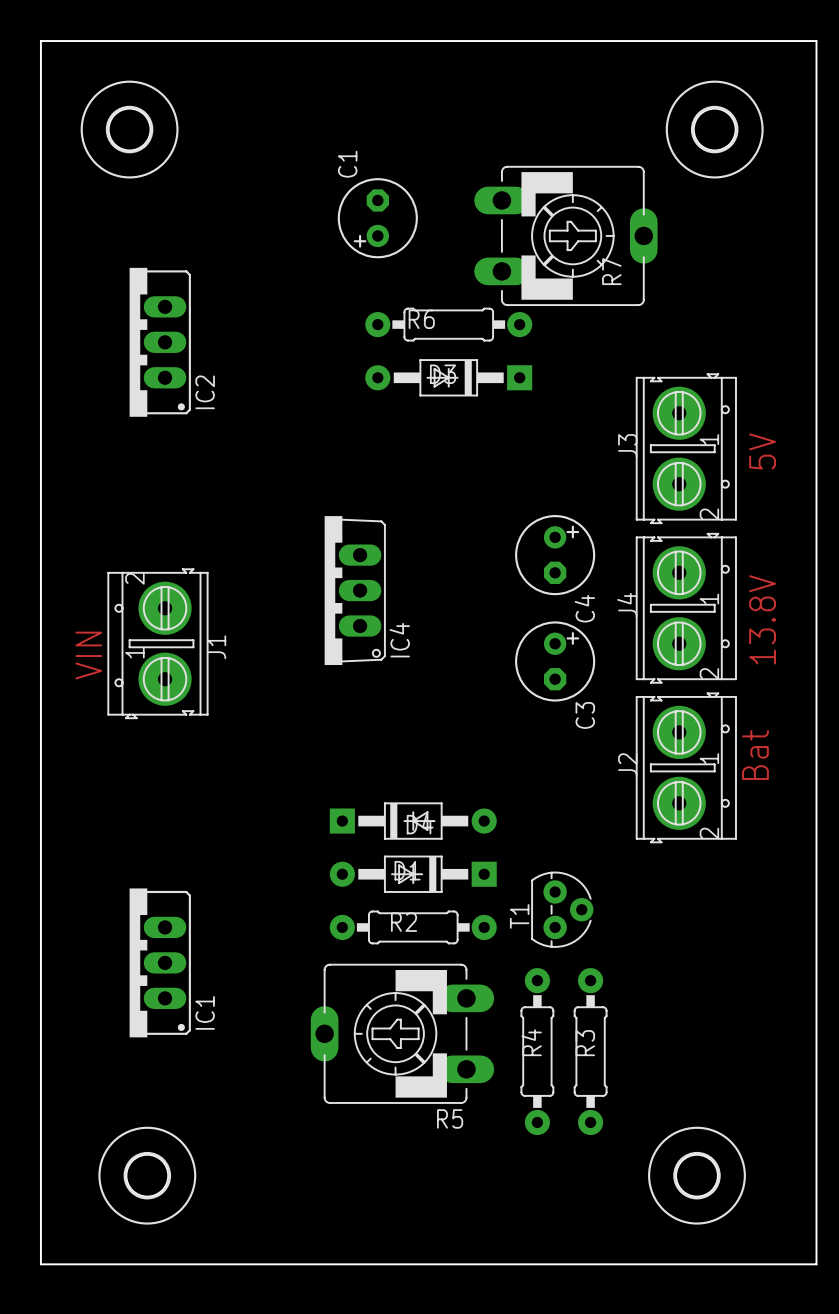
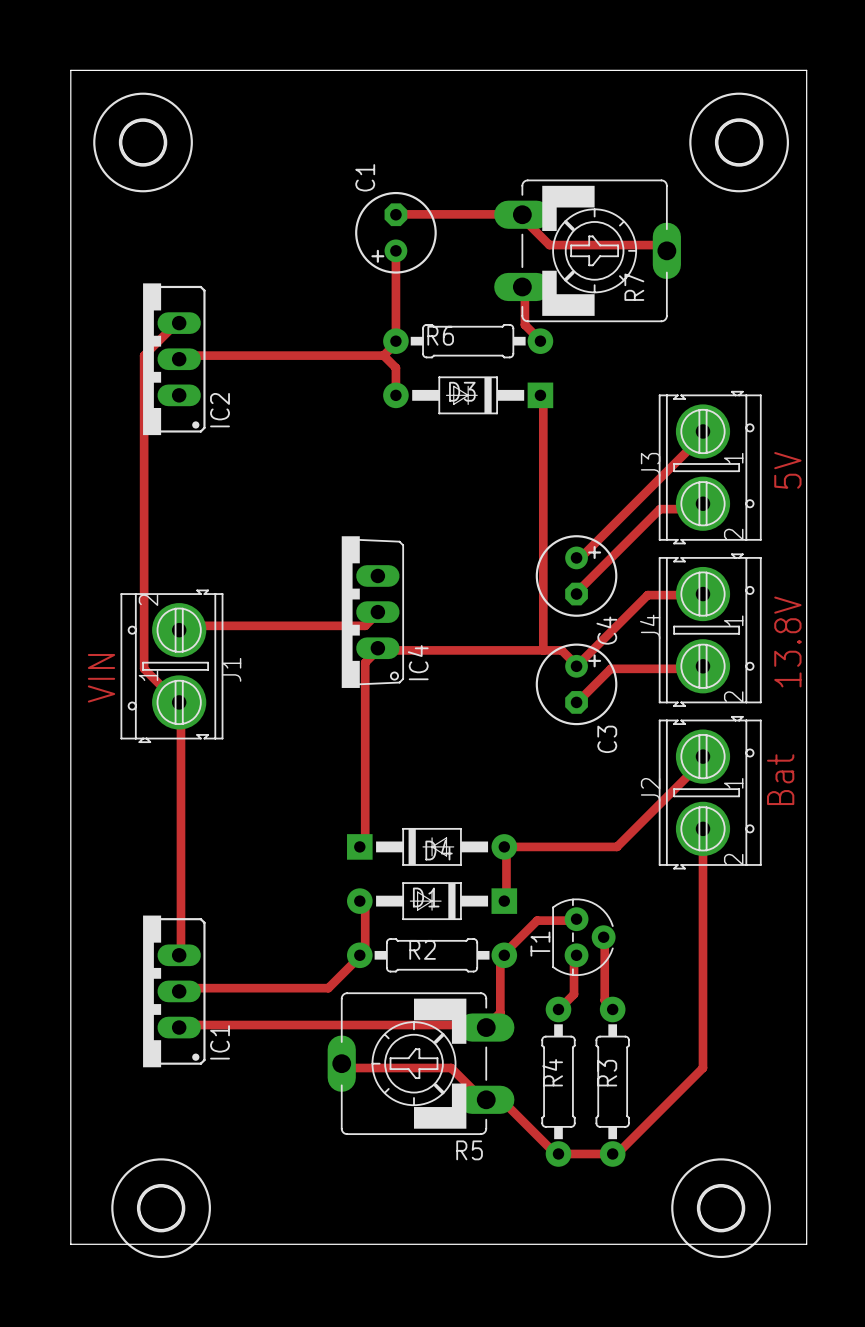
board edge: (40, 41) (816, 41) (816, 1264) (40, 1264) (40, 41) -> (70, 70) (70, 1244) (806, 1244) (806, 70) (70, 70)
track: none -> (395, 214) (522, 214) (524, 220) (549, 245) (666, 245) (666, 250)
track: none -> (395, 250) (395, 343) (383, 355)
track: none -> (522, 286) (524, 288) (524, 324) (540, 341)
track: none -> (179, 323) (174, 324) (144, 355) (144, 668) (180, 705) (180, 951) (179, 955)
track: none -> (383, 355) (180, 355) (179, 359)
track: none -> (383, 355) (395, 367) (395, 395)
track: none -> (540, 395) (543, 398) (543, 650)
track: none -> (702, 431) (702, 435) (580, 558) (576, 557)
track: none -> (702, 503) (702, 509) (660, 509) (576, 594)
track: none -> (702, 594) (647, 595) (576, 666) (561, 650) (383, 650) (377, 648) (365, 662) (365, 846) (359, 846)
track: none -> (377, 612) (365, 625) (180, 625) (179, 630)
track: none -> (702, 666) (702, 668) (610, 668) (576, 702)
track: none -> (702, 756) (702, 760) (617, 846) (504, 846)
track: none -> (702, 828) (702, 1068) (617, 1153) (555, 1153) (506, 1104) (488, 1104) (486, 1099) (481, 1098) (451, 1068) (346, 1068) (341, 1063)
track: none -> (506, 846) (506, 896) (504, 901)
track: none -> (359, 901) (365, 902) (365, 951) (328, 988) (180, 988) (179, 991)
track: none -> (576, 919) (537, 920) (500, 957) (500, 1012) (486, 1027) (481, 1025) (180, 1025) (179, 1027)
track: none -> (603, 937) (604, 1000) (612, 1009)
track: none -> (576, 955) (574, 957) (574, 994) (558, 1009)

